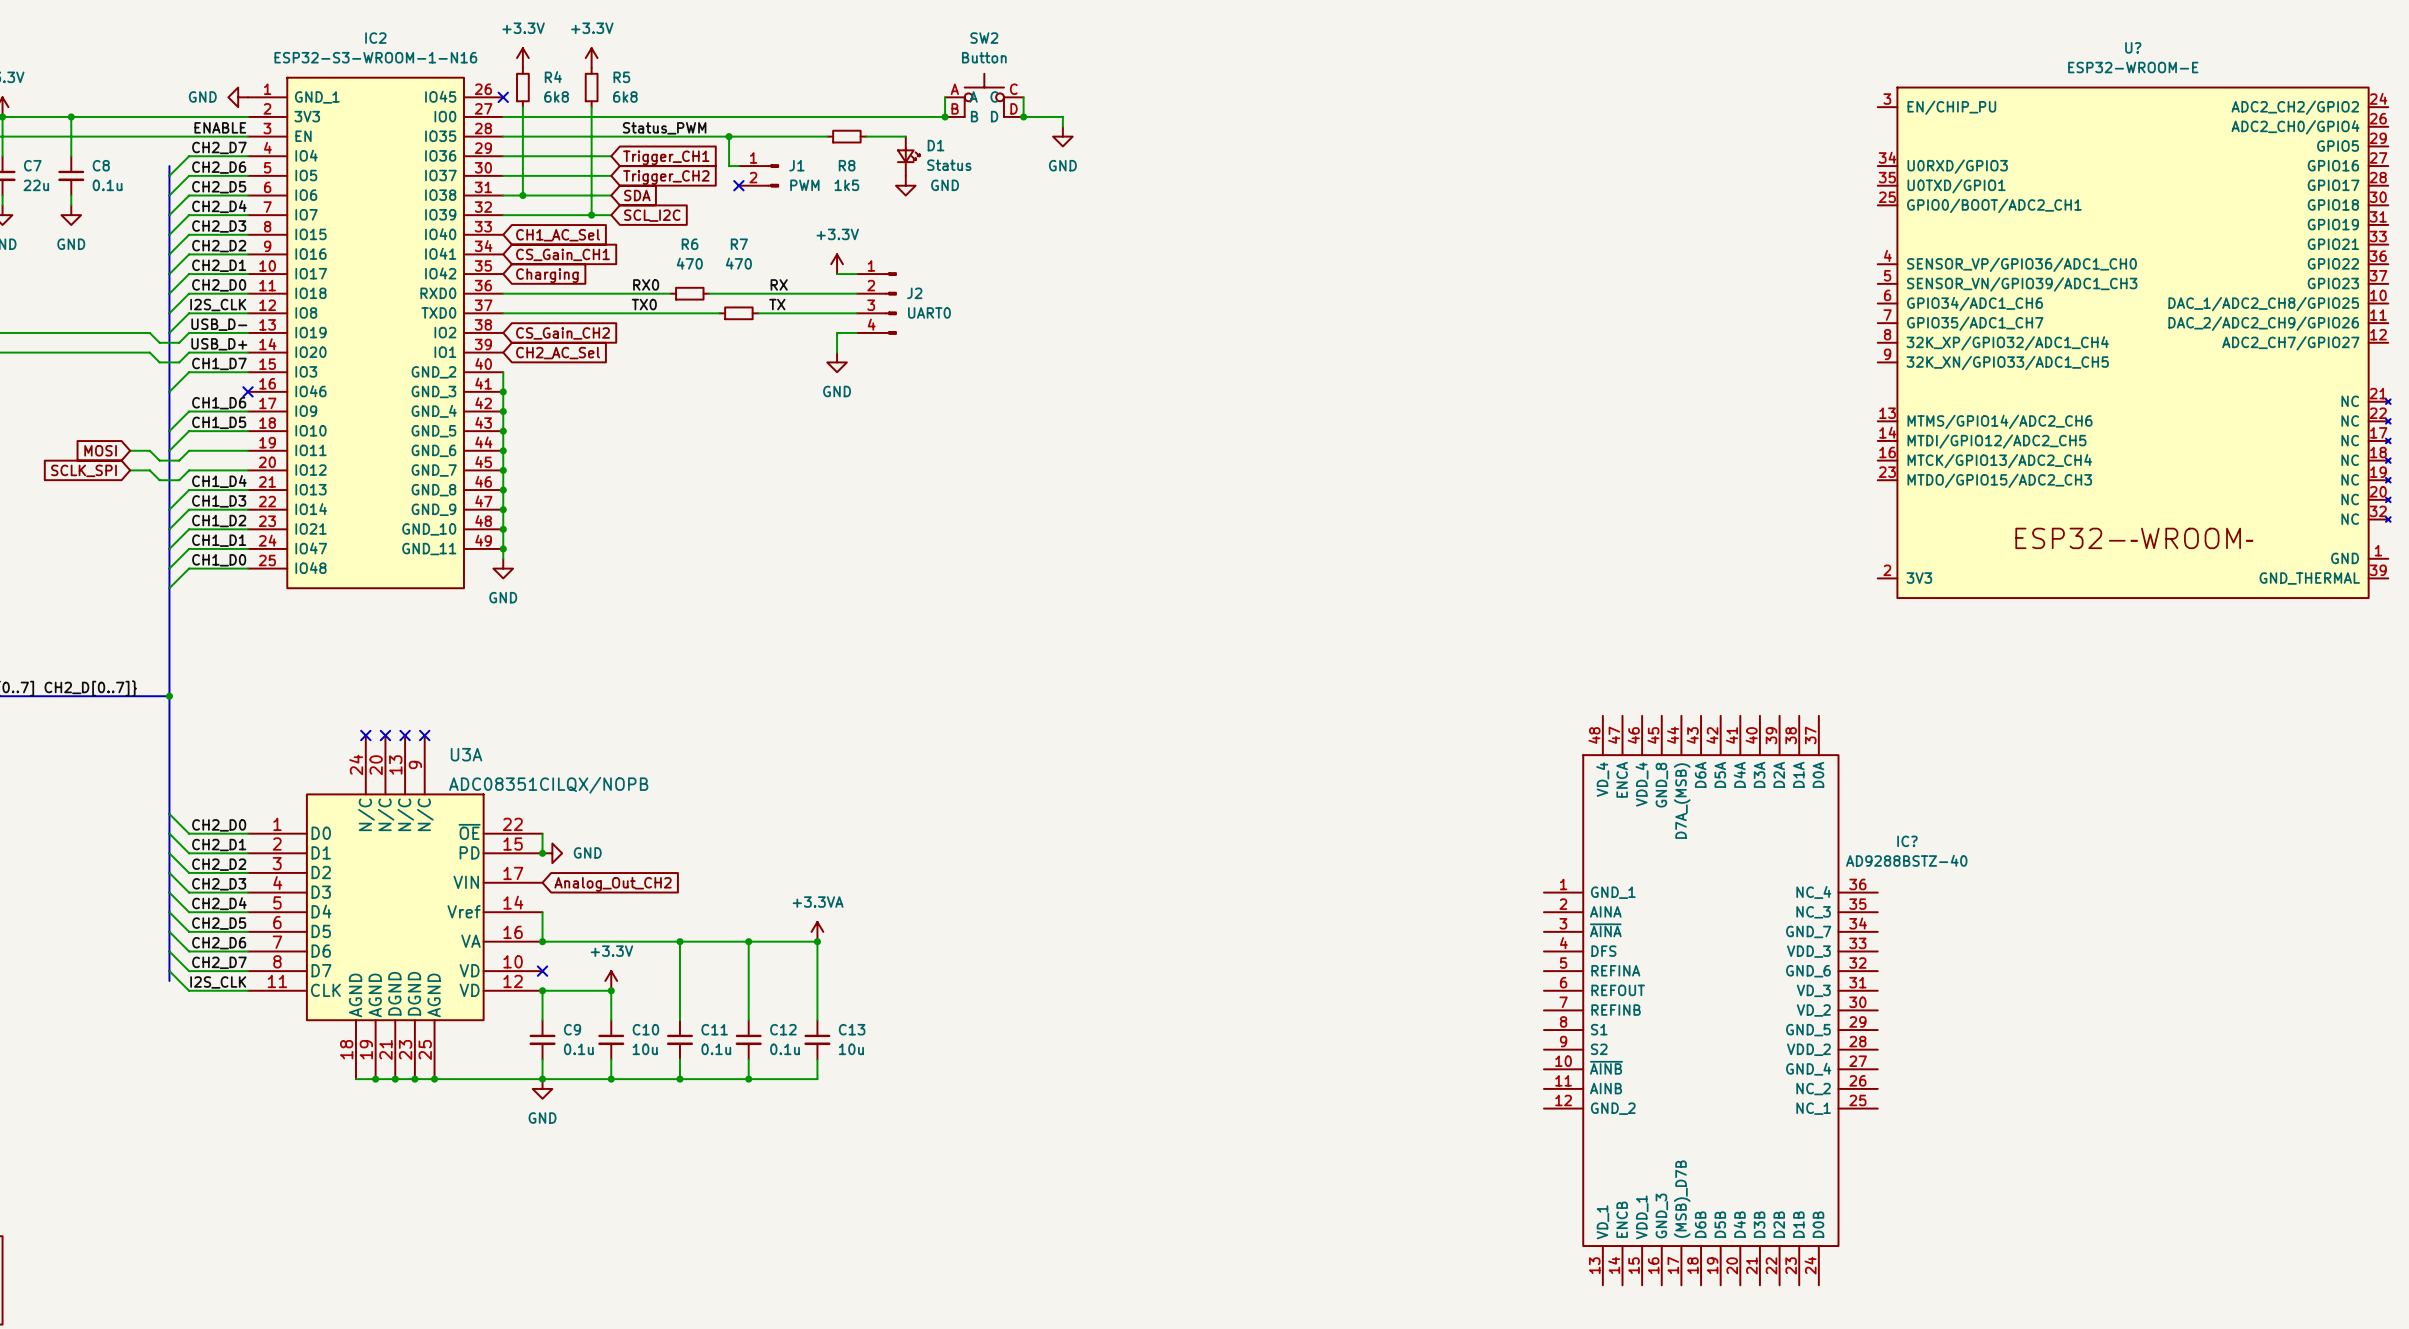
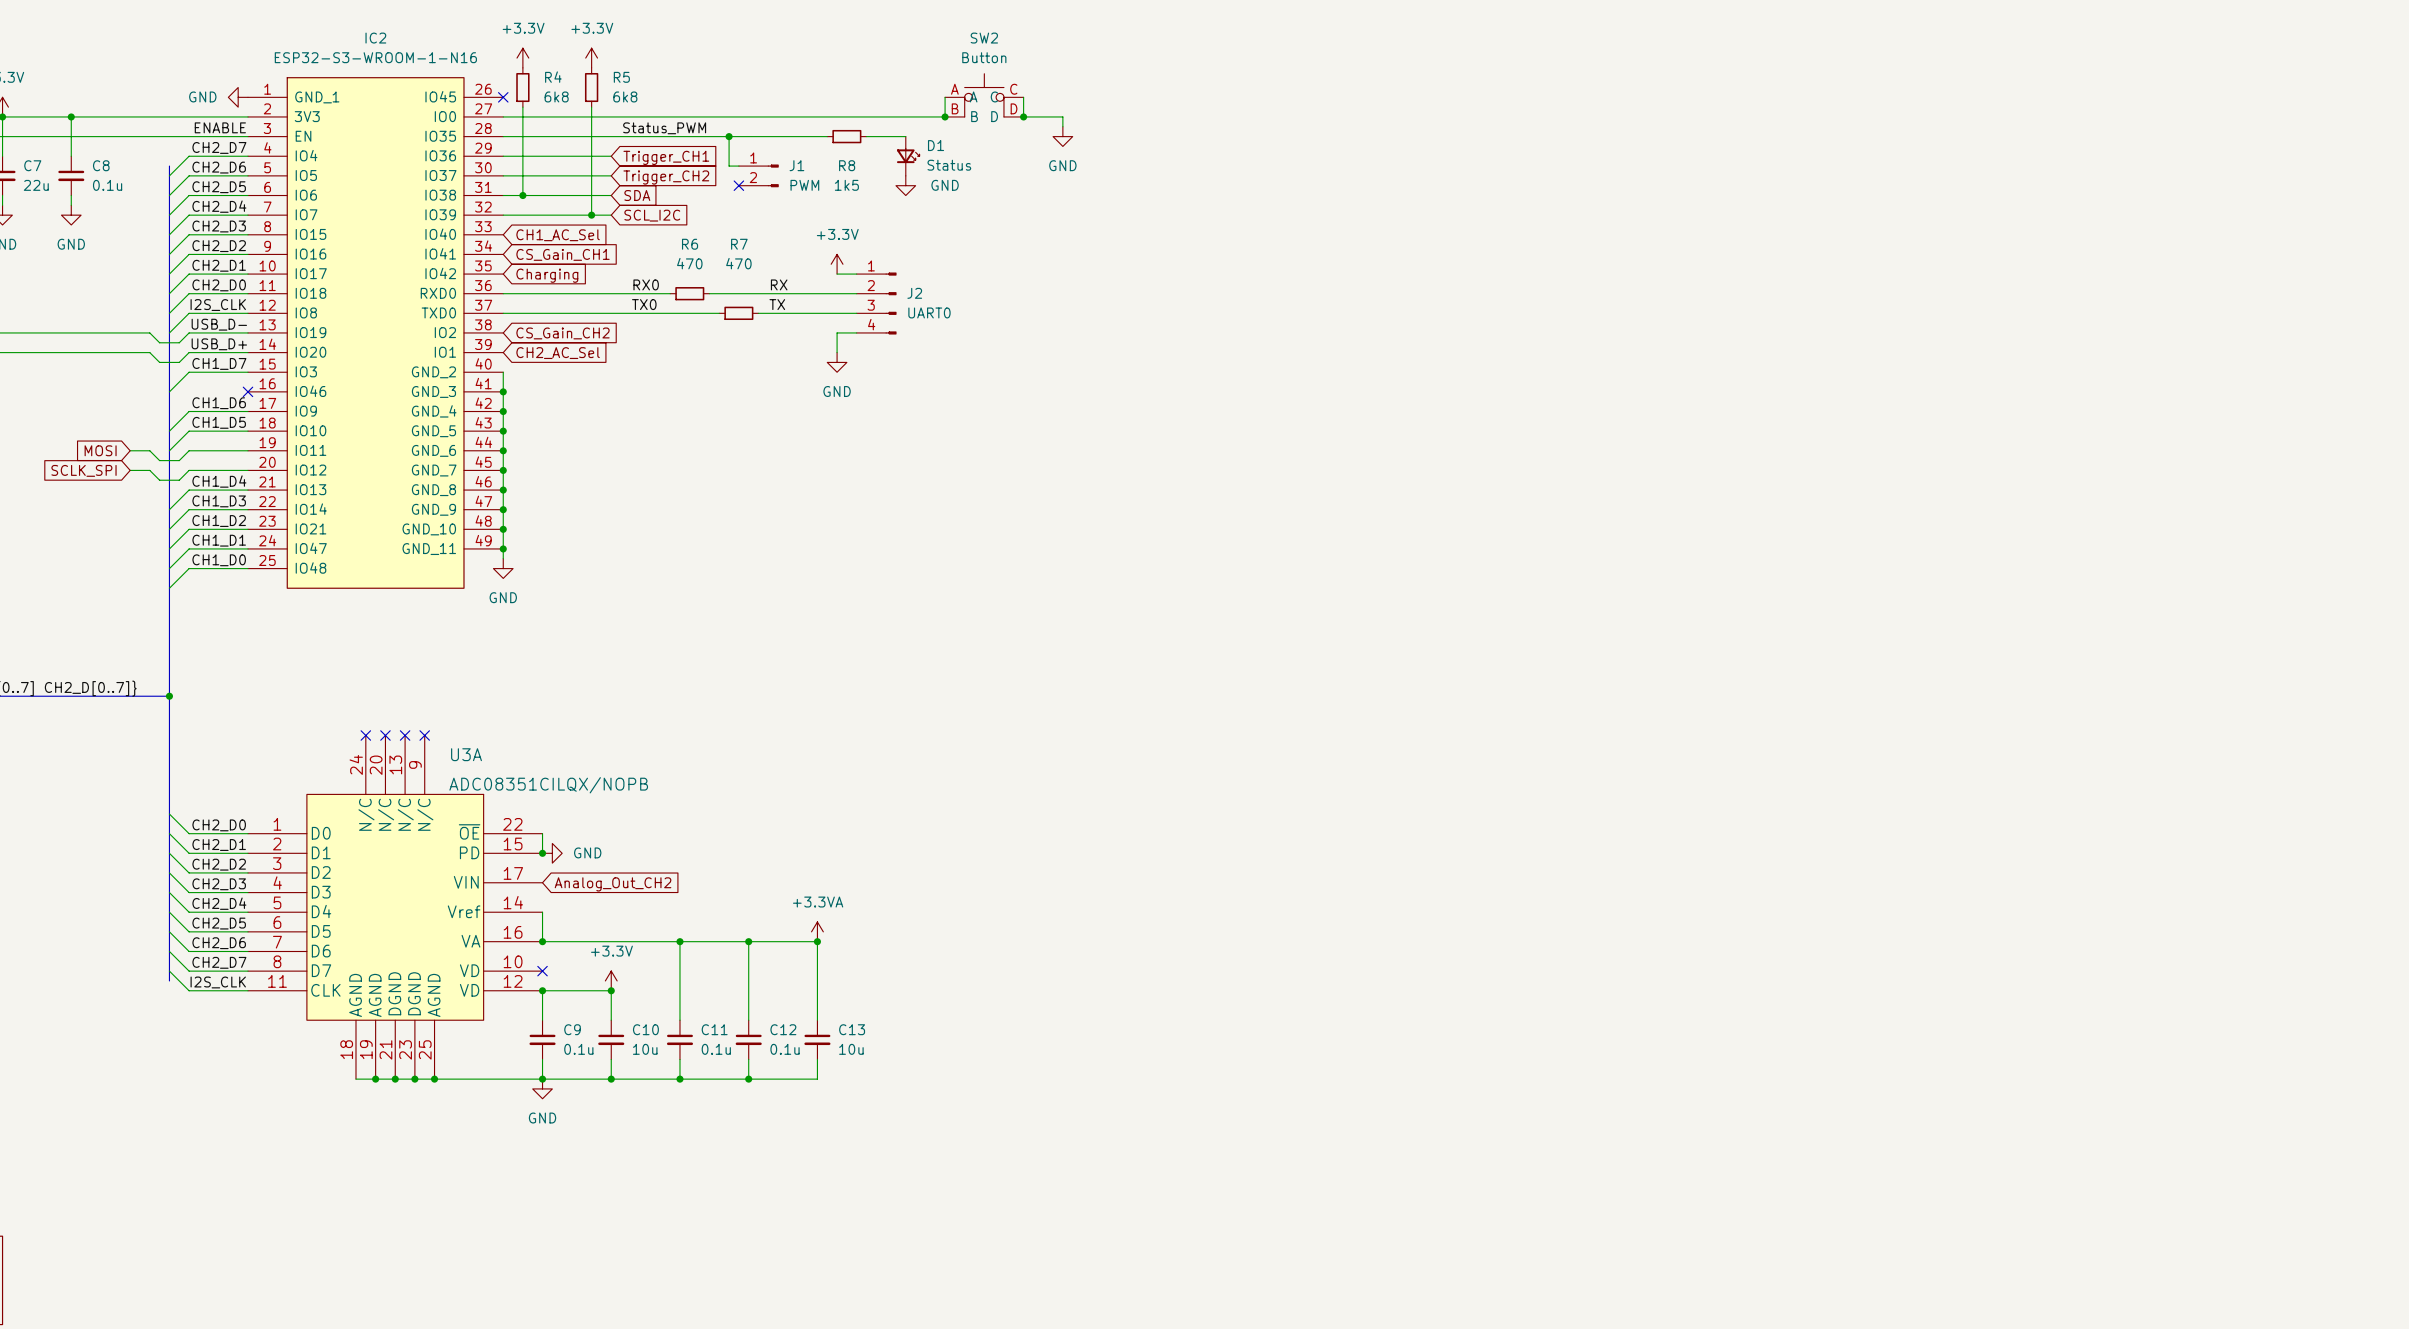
U?: ESP32-WROOM-E (2134, 342) -> none
IC?: AD9288BSTZ-40 (1710, 1000) -> none

